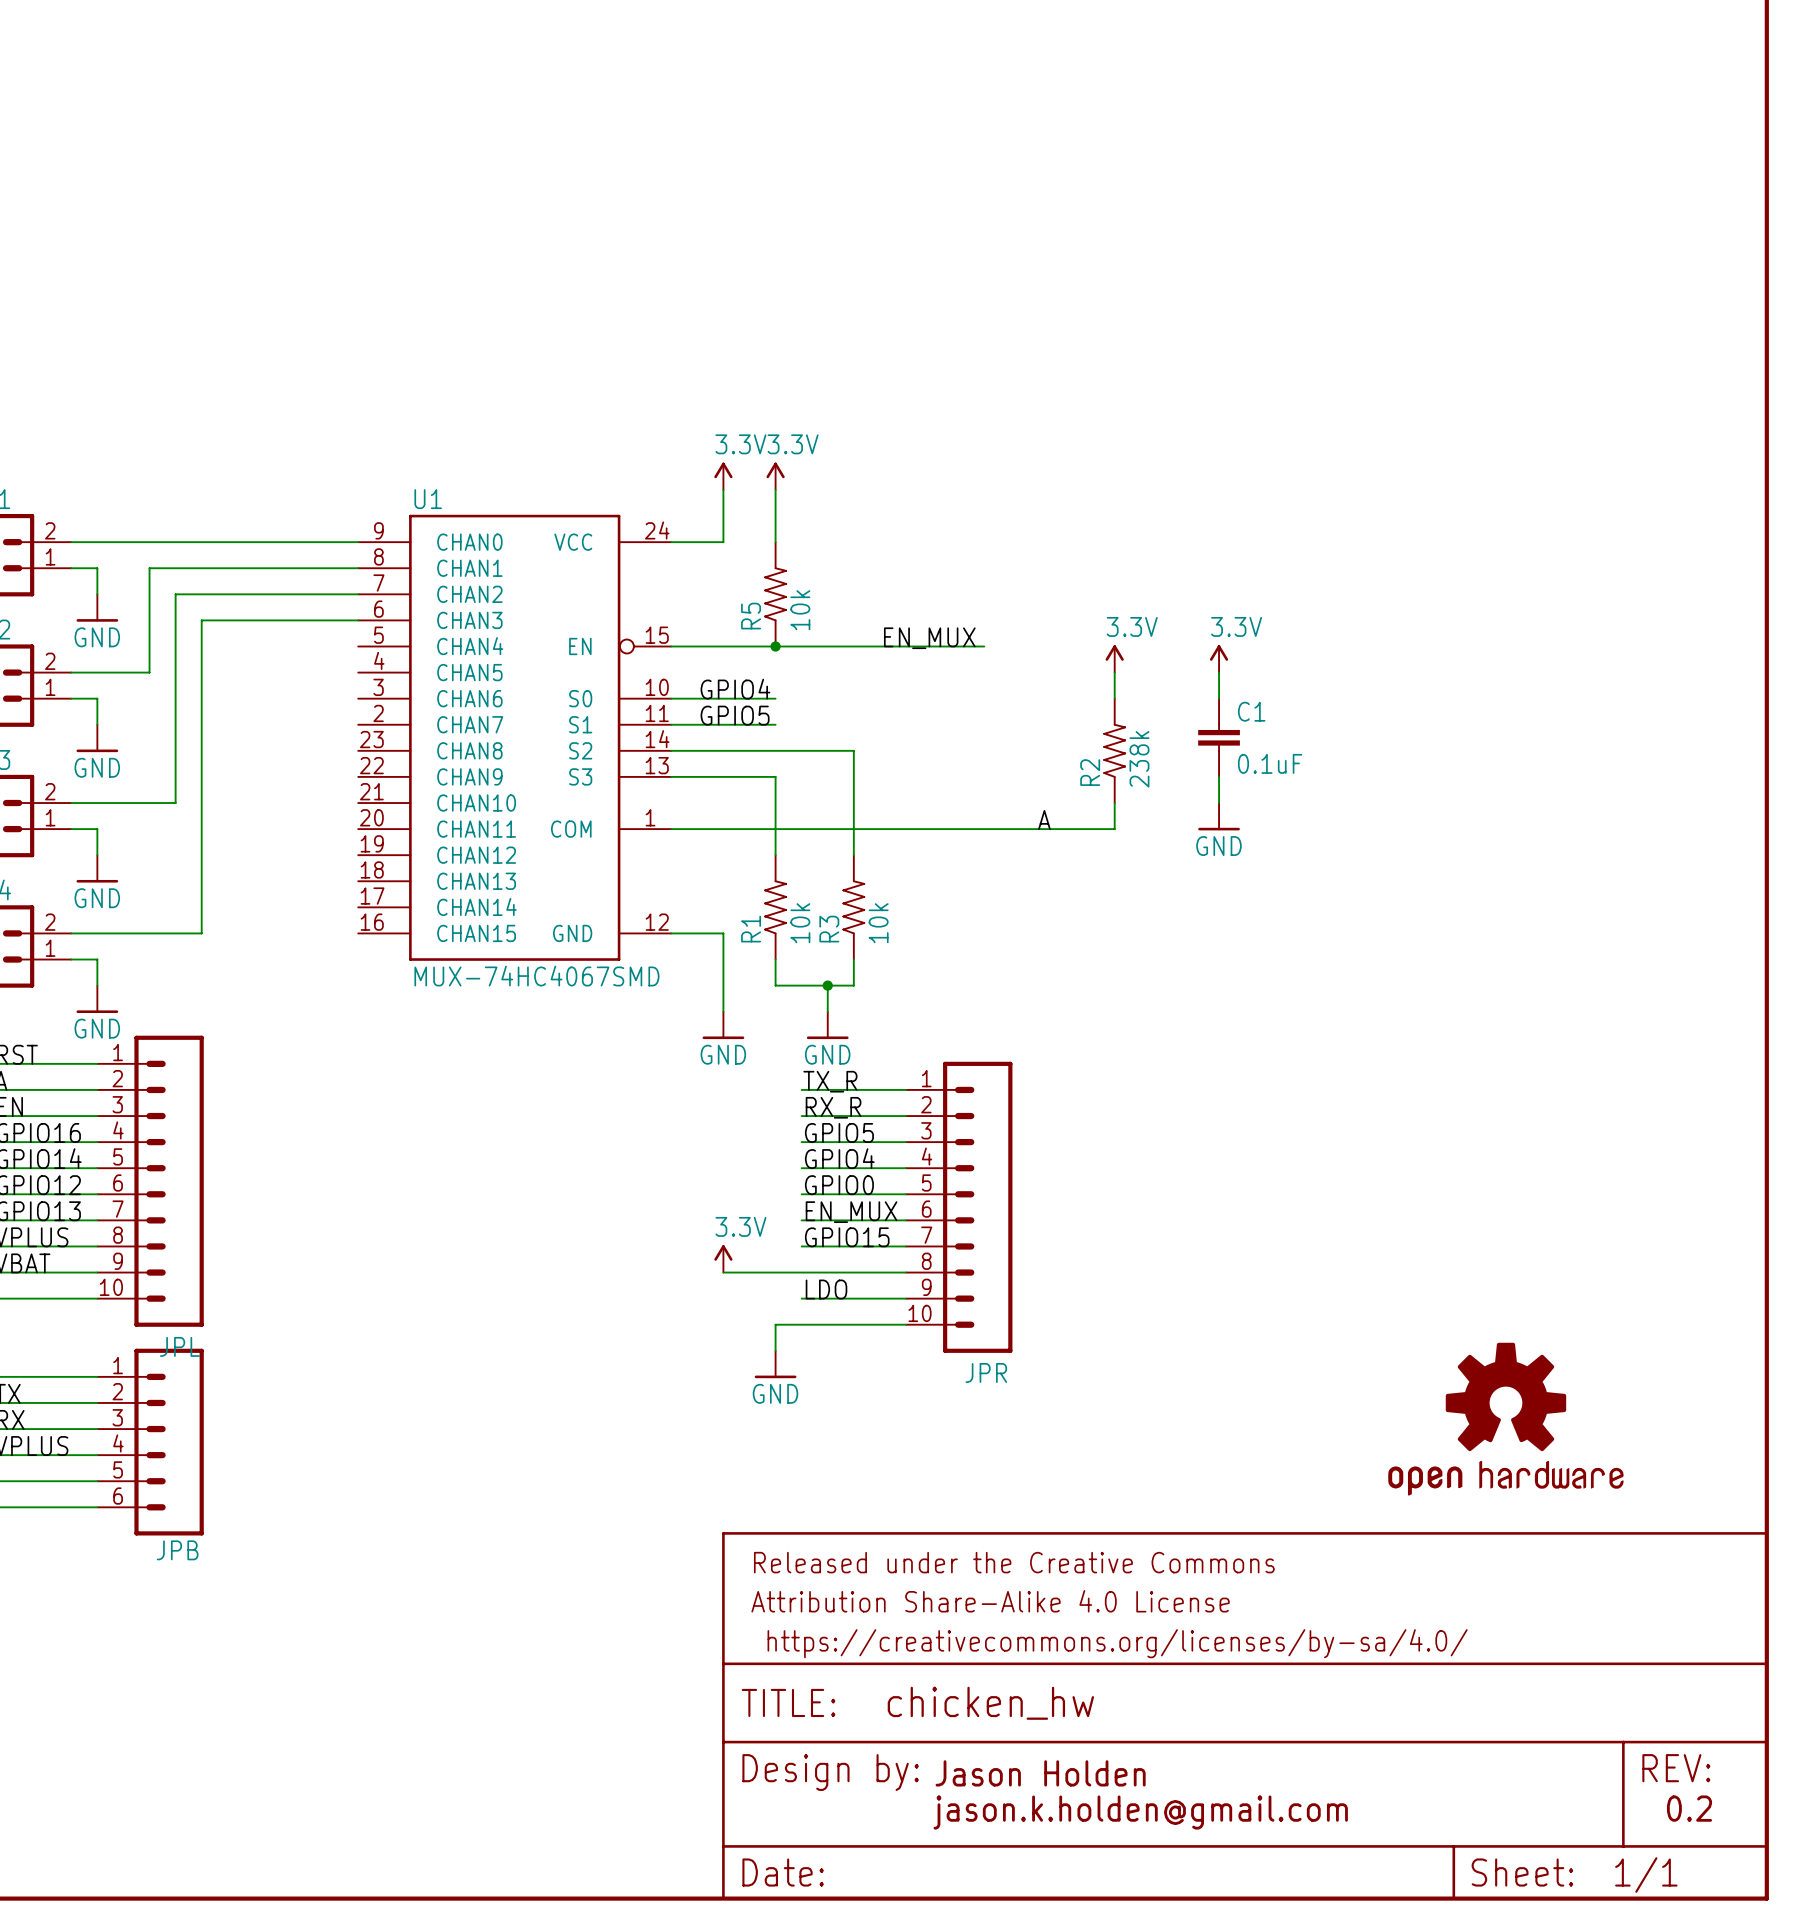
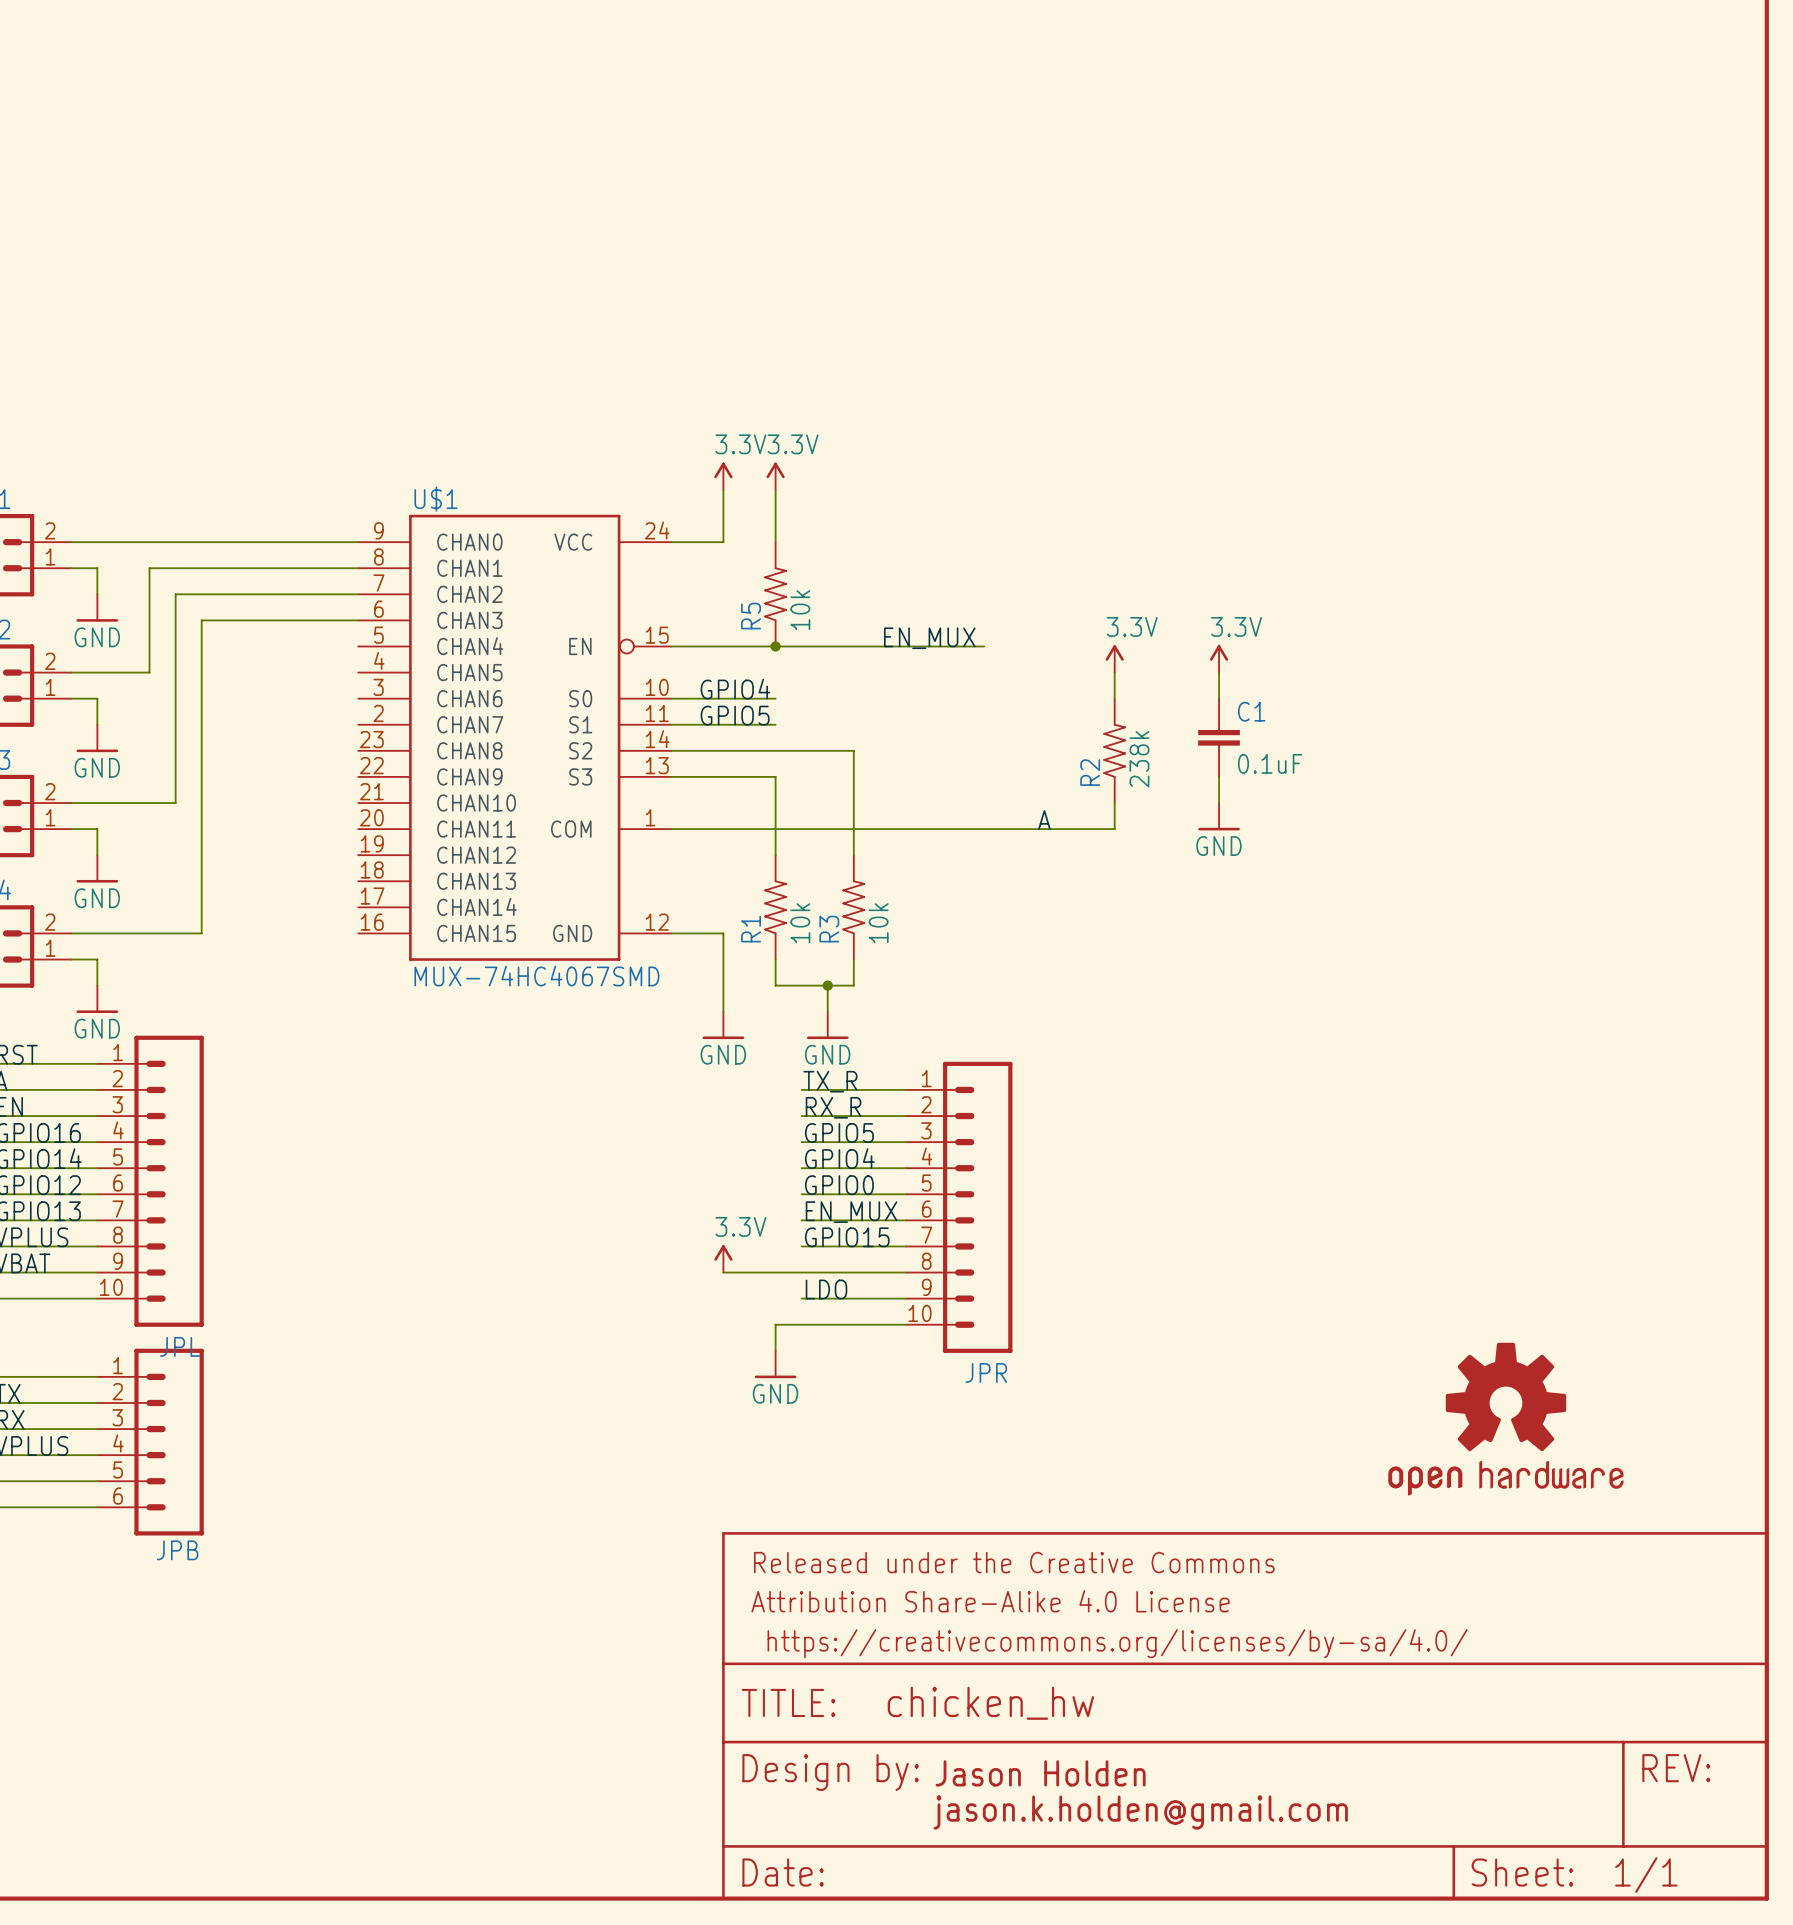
U1 name: U1 (428, 499) -> U$1 (436, 499)
text: 0.2 (1689, 1808) -> none

